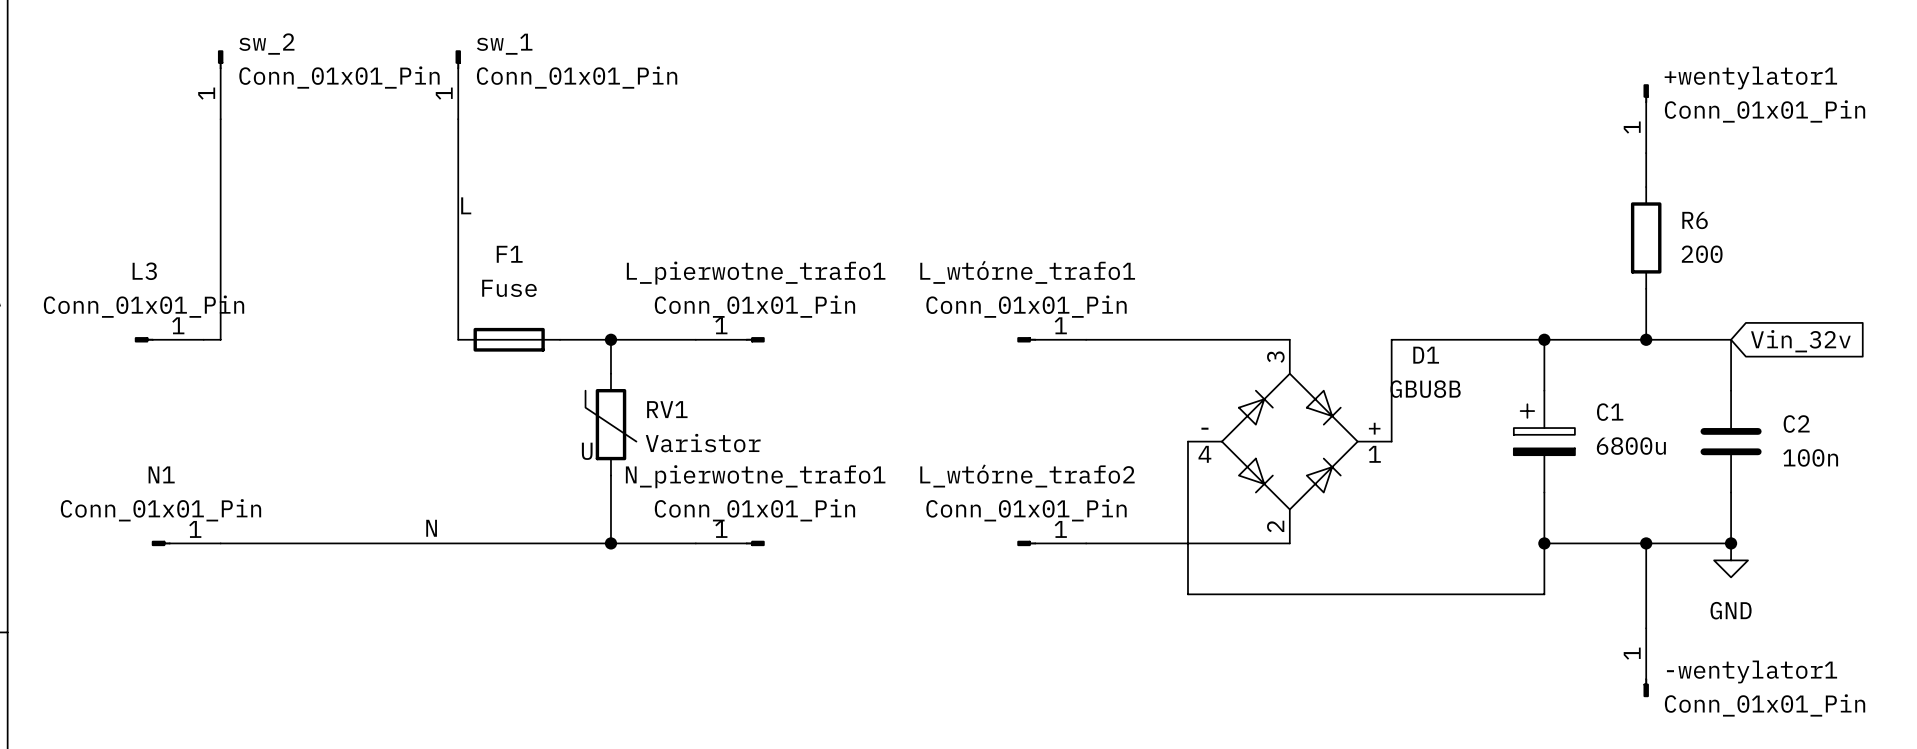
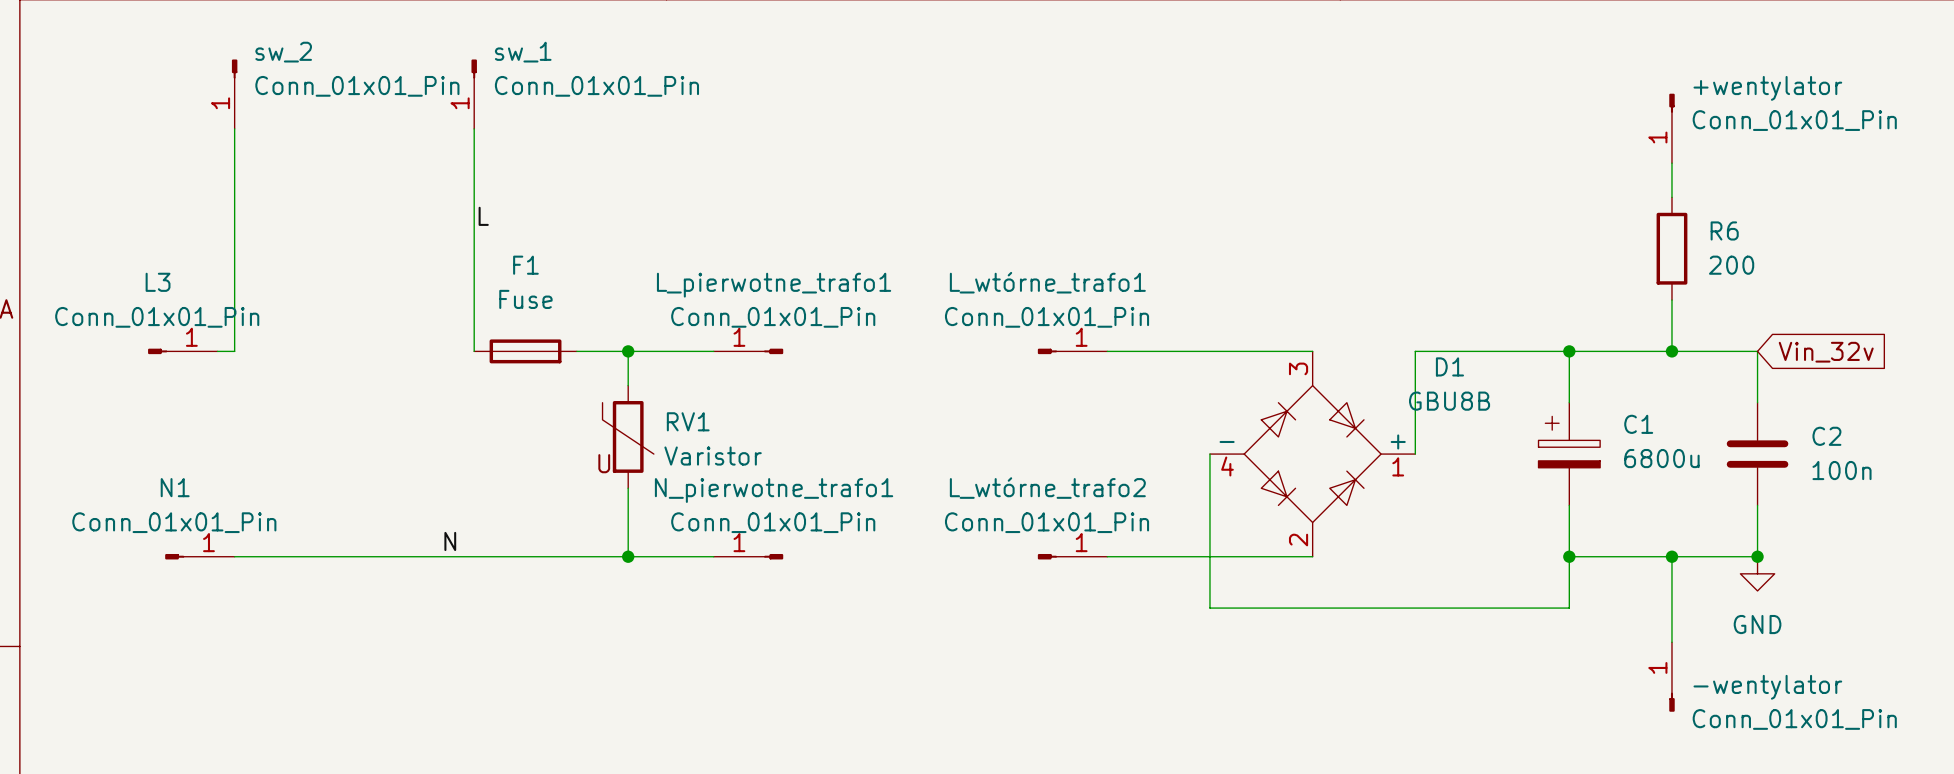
+wentylator1 name: +wentylator1 (1750, 78) -> +wentylator (1767, 88)
-wentylator1 name: -wentylator1 (1752, 671) -> -wentylator (1767, 687)

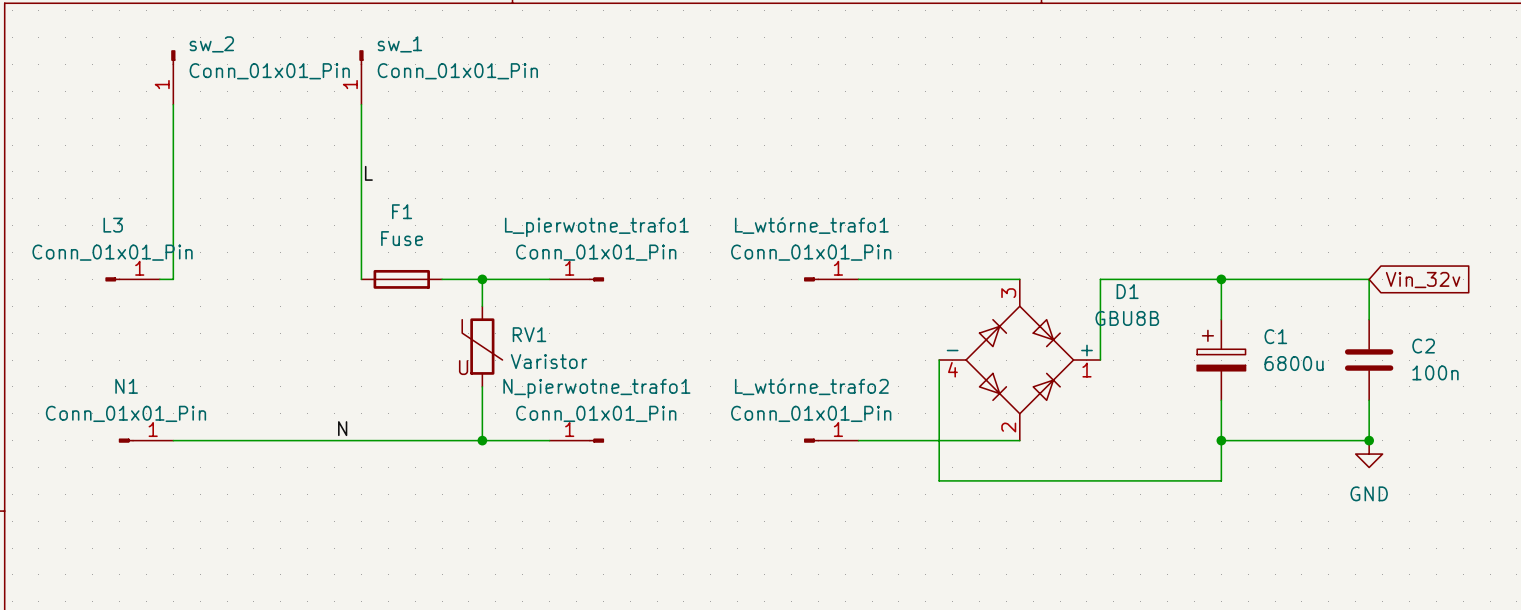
+wentylator: Conn_01x01_Pin (1671, 128) -> none
wire: (1671, 163) (1671, 197) -> none
R6: 200 (1671, 248) -> none
wire: (1671, 300) (1671, 351) -> none
junction: (1671, 351) -> none
wire: (1671, 556) (1671, 642) -> none
junction: (1671, 556) -> none
-wentylator: Conn_01x01_Pin (1671, 677) -> none

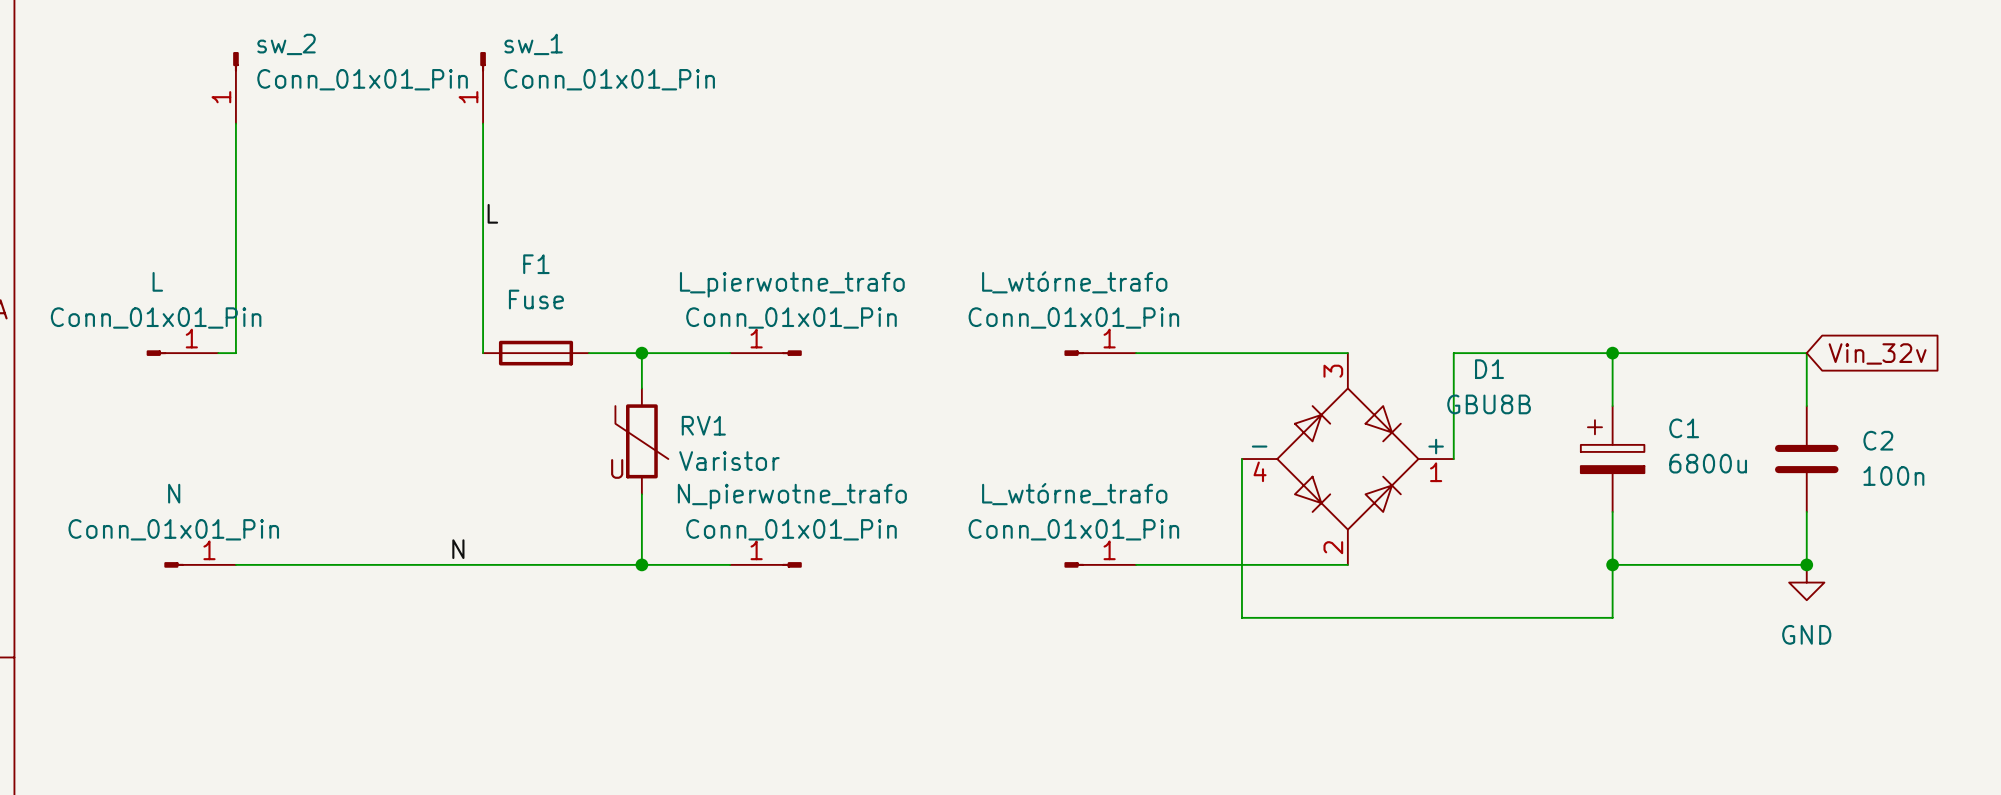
L3 name: L3 (113, 225) -> L (157, 281)
L_wtórne_trafo1 name: L_wtórne_trafo1 (811, 225) -> L_wtórne_trafo (1074, 282)
L_pierwotne_trafo1 name: L_pierwotne_trafo1 (596, 227) -> L_pierwotne_trafo (792, 284)
N1 name: N1 (126, 386) -> N (174, 493)
L_wtórne_trafo2 name: L_wtórne_trafo2 (811, 386) -> L_wtórne_trafo (1074, 494)
N_pierwotne_trafo1 name: N_pierwotne_trafo1 (596, 388) -> N_pierwotne_trafo (792, 496)

